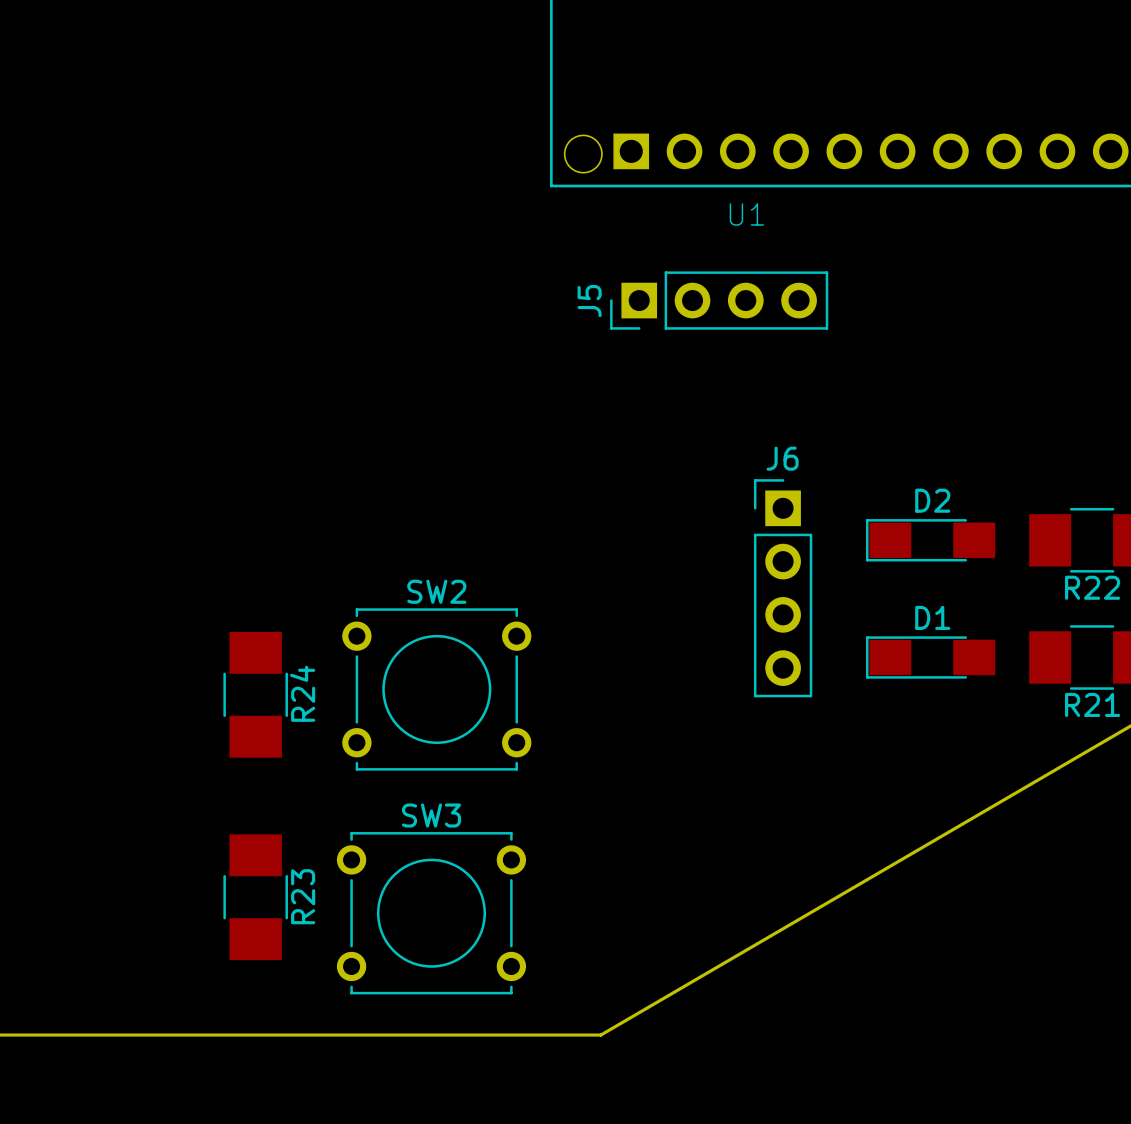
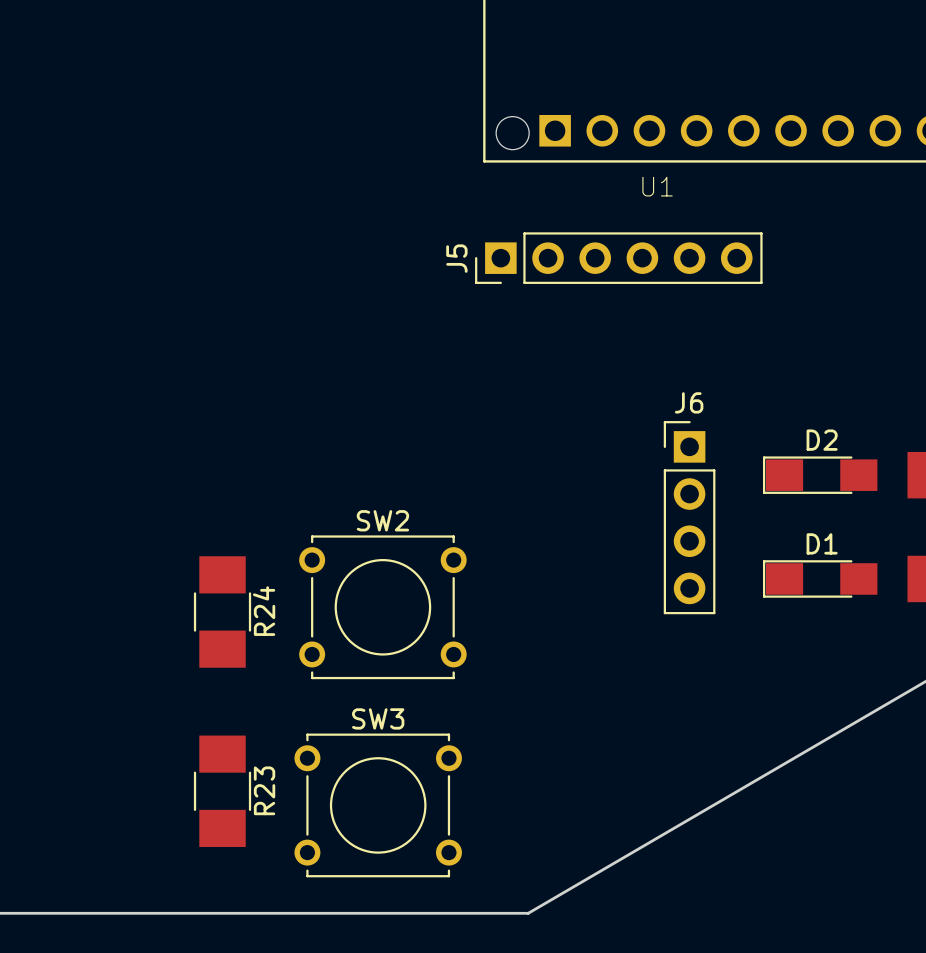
J5 footprint: [610, 271, 829, 330] -> [475, 232, 763, 284]
J5 name position: J5 (589, 301) -> J5 (456, 258)

